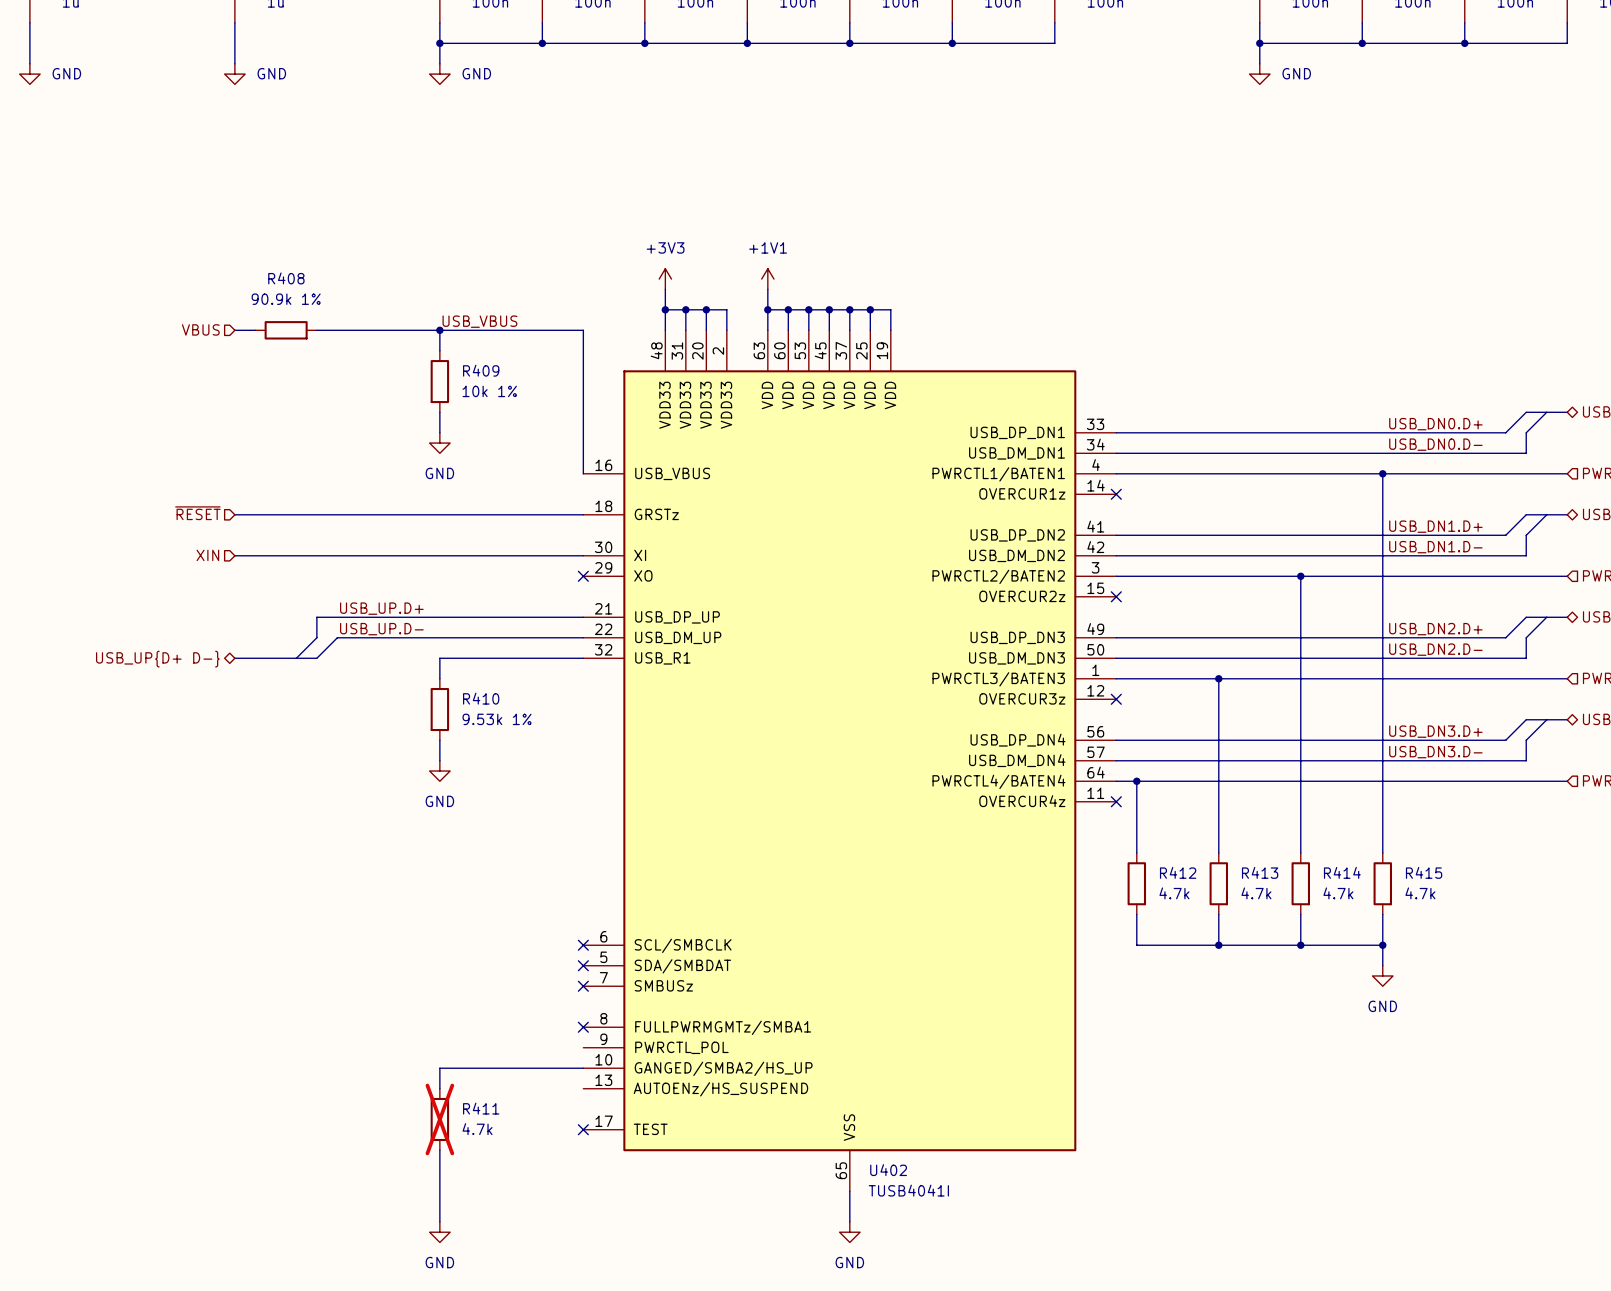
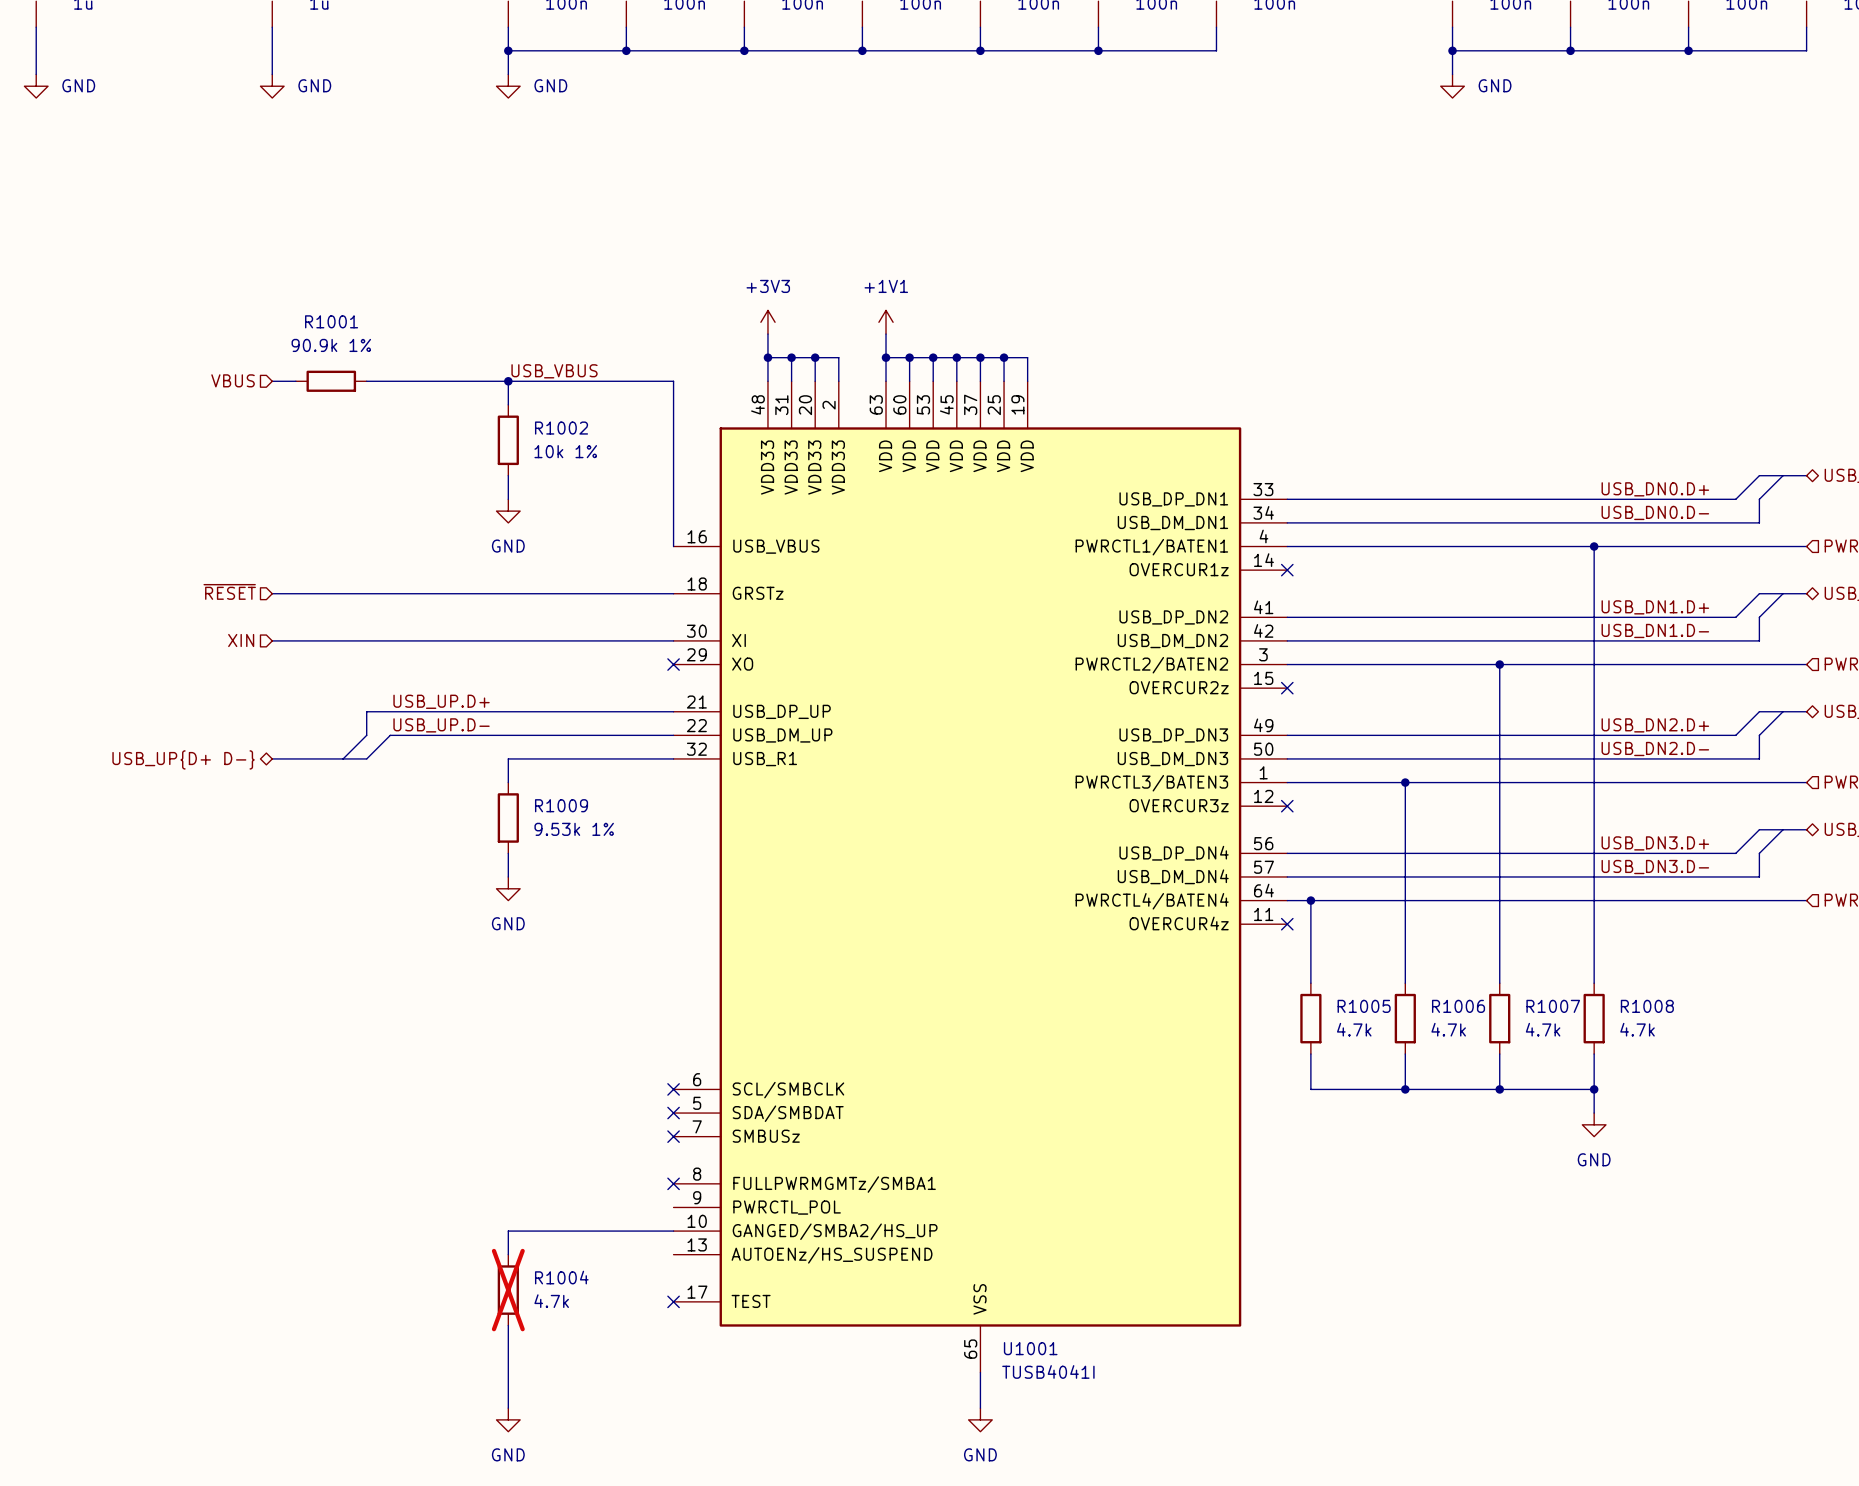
R408 name: R408 (286, 278) -> R1001 (331, 321)
R409 name: R409 (481, 370) -> R1002 (561, 428)
R410 name: R410 (481, 698) -> R1009 (561, 805)
R412 name: R412 (1178, 872) -> R1005 (1364, 1006)
R413 name: R413 (1260, 872) -> R1006 (1458, 1006)
R414 name: R414 (1342, 872) -> R1007 (1553, 1006)
R415 name: R415 (1424, 872) -> R1008 (1647, 1006)
R411 name: R411 (481, 1108) -> R1004 (561, 1277)
U402 name: U402 (888, 1170) -> U1001 (1030, 1348)

